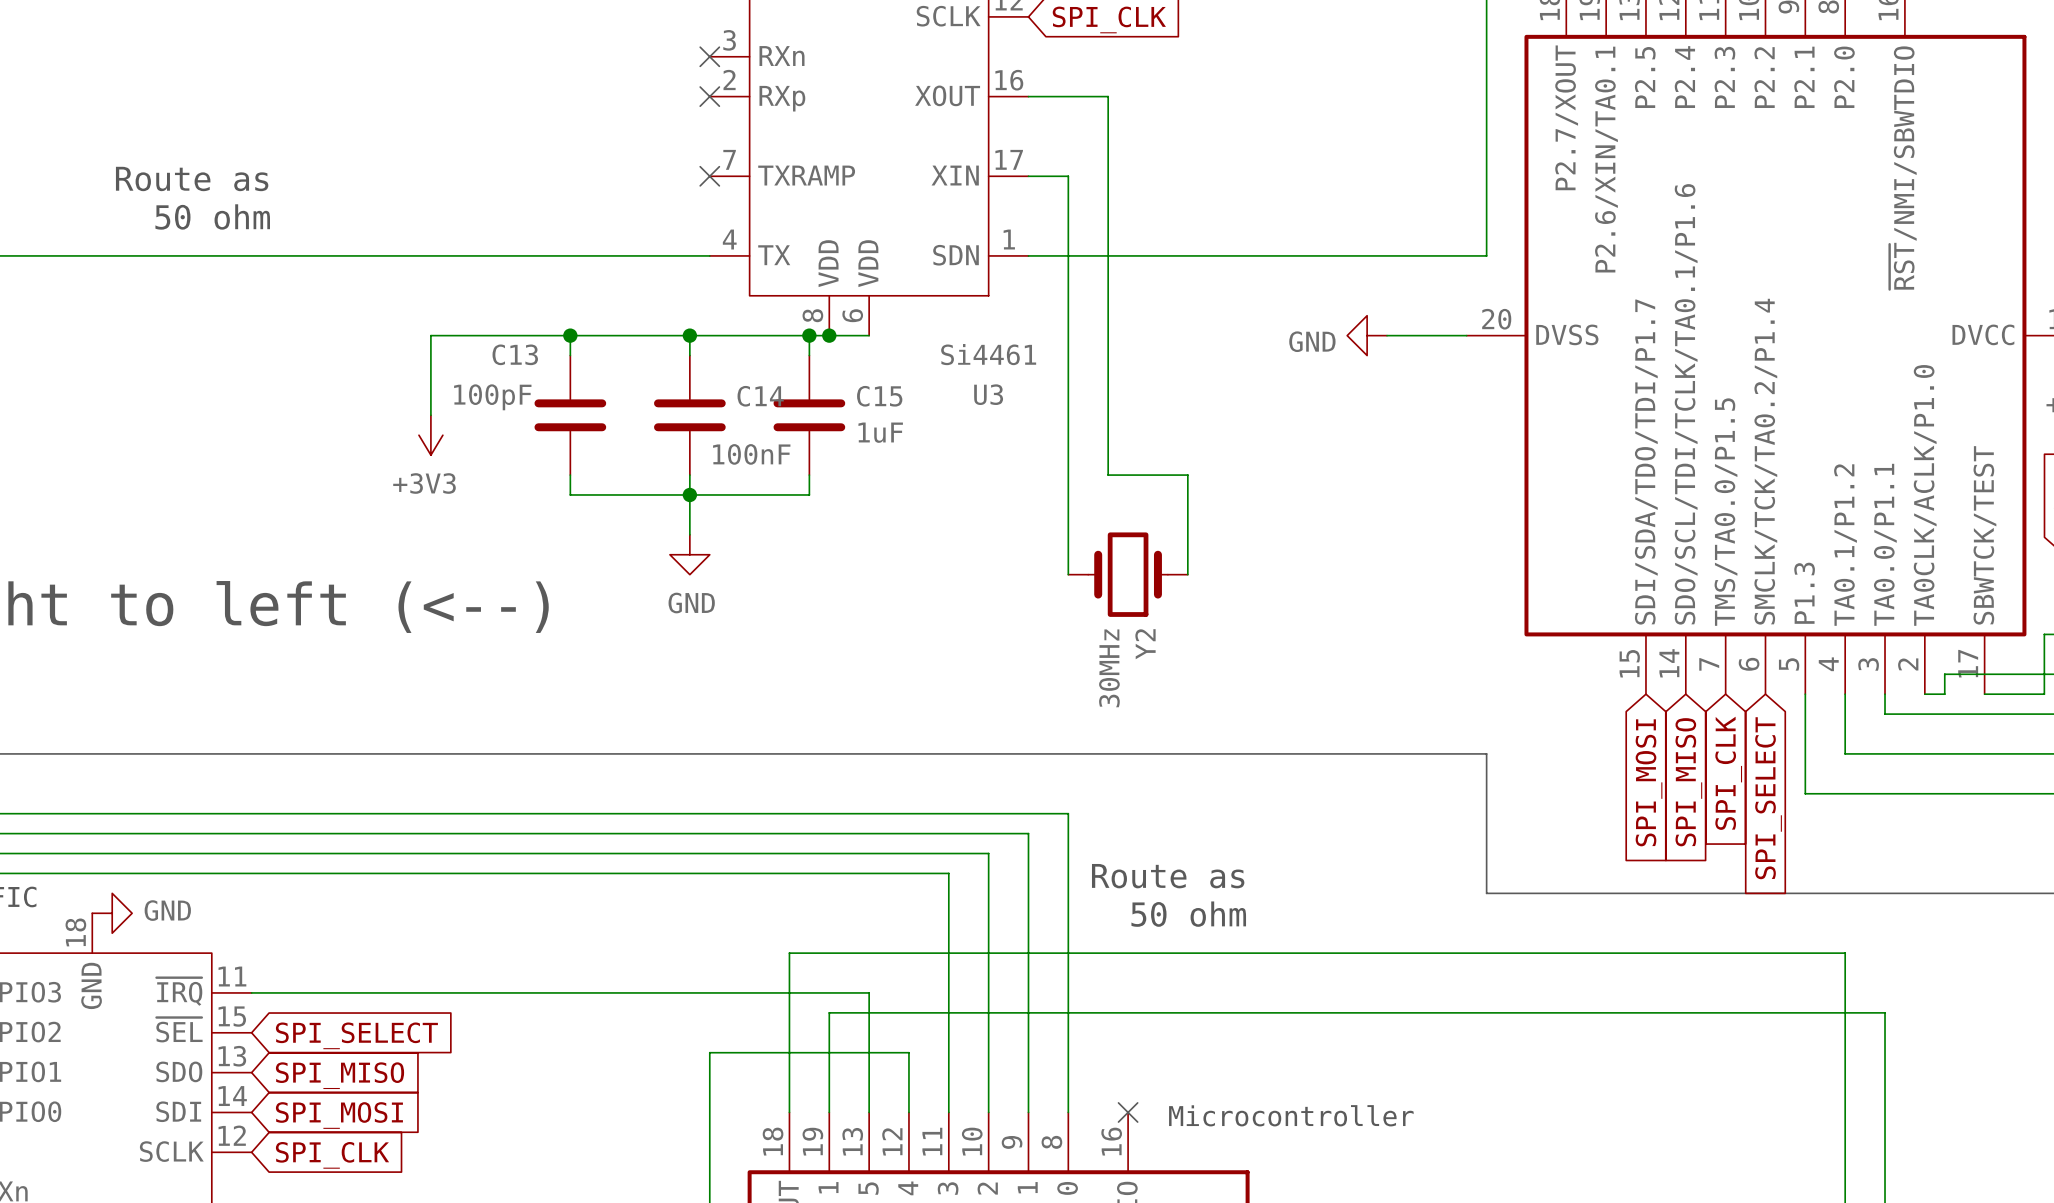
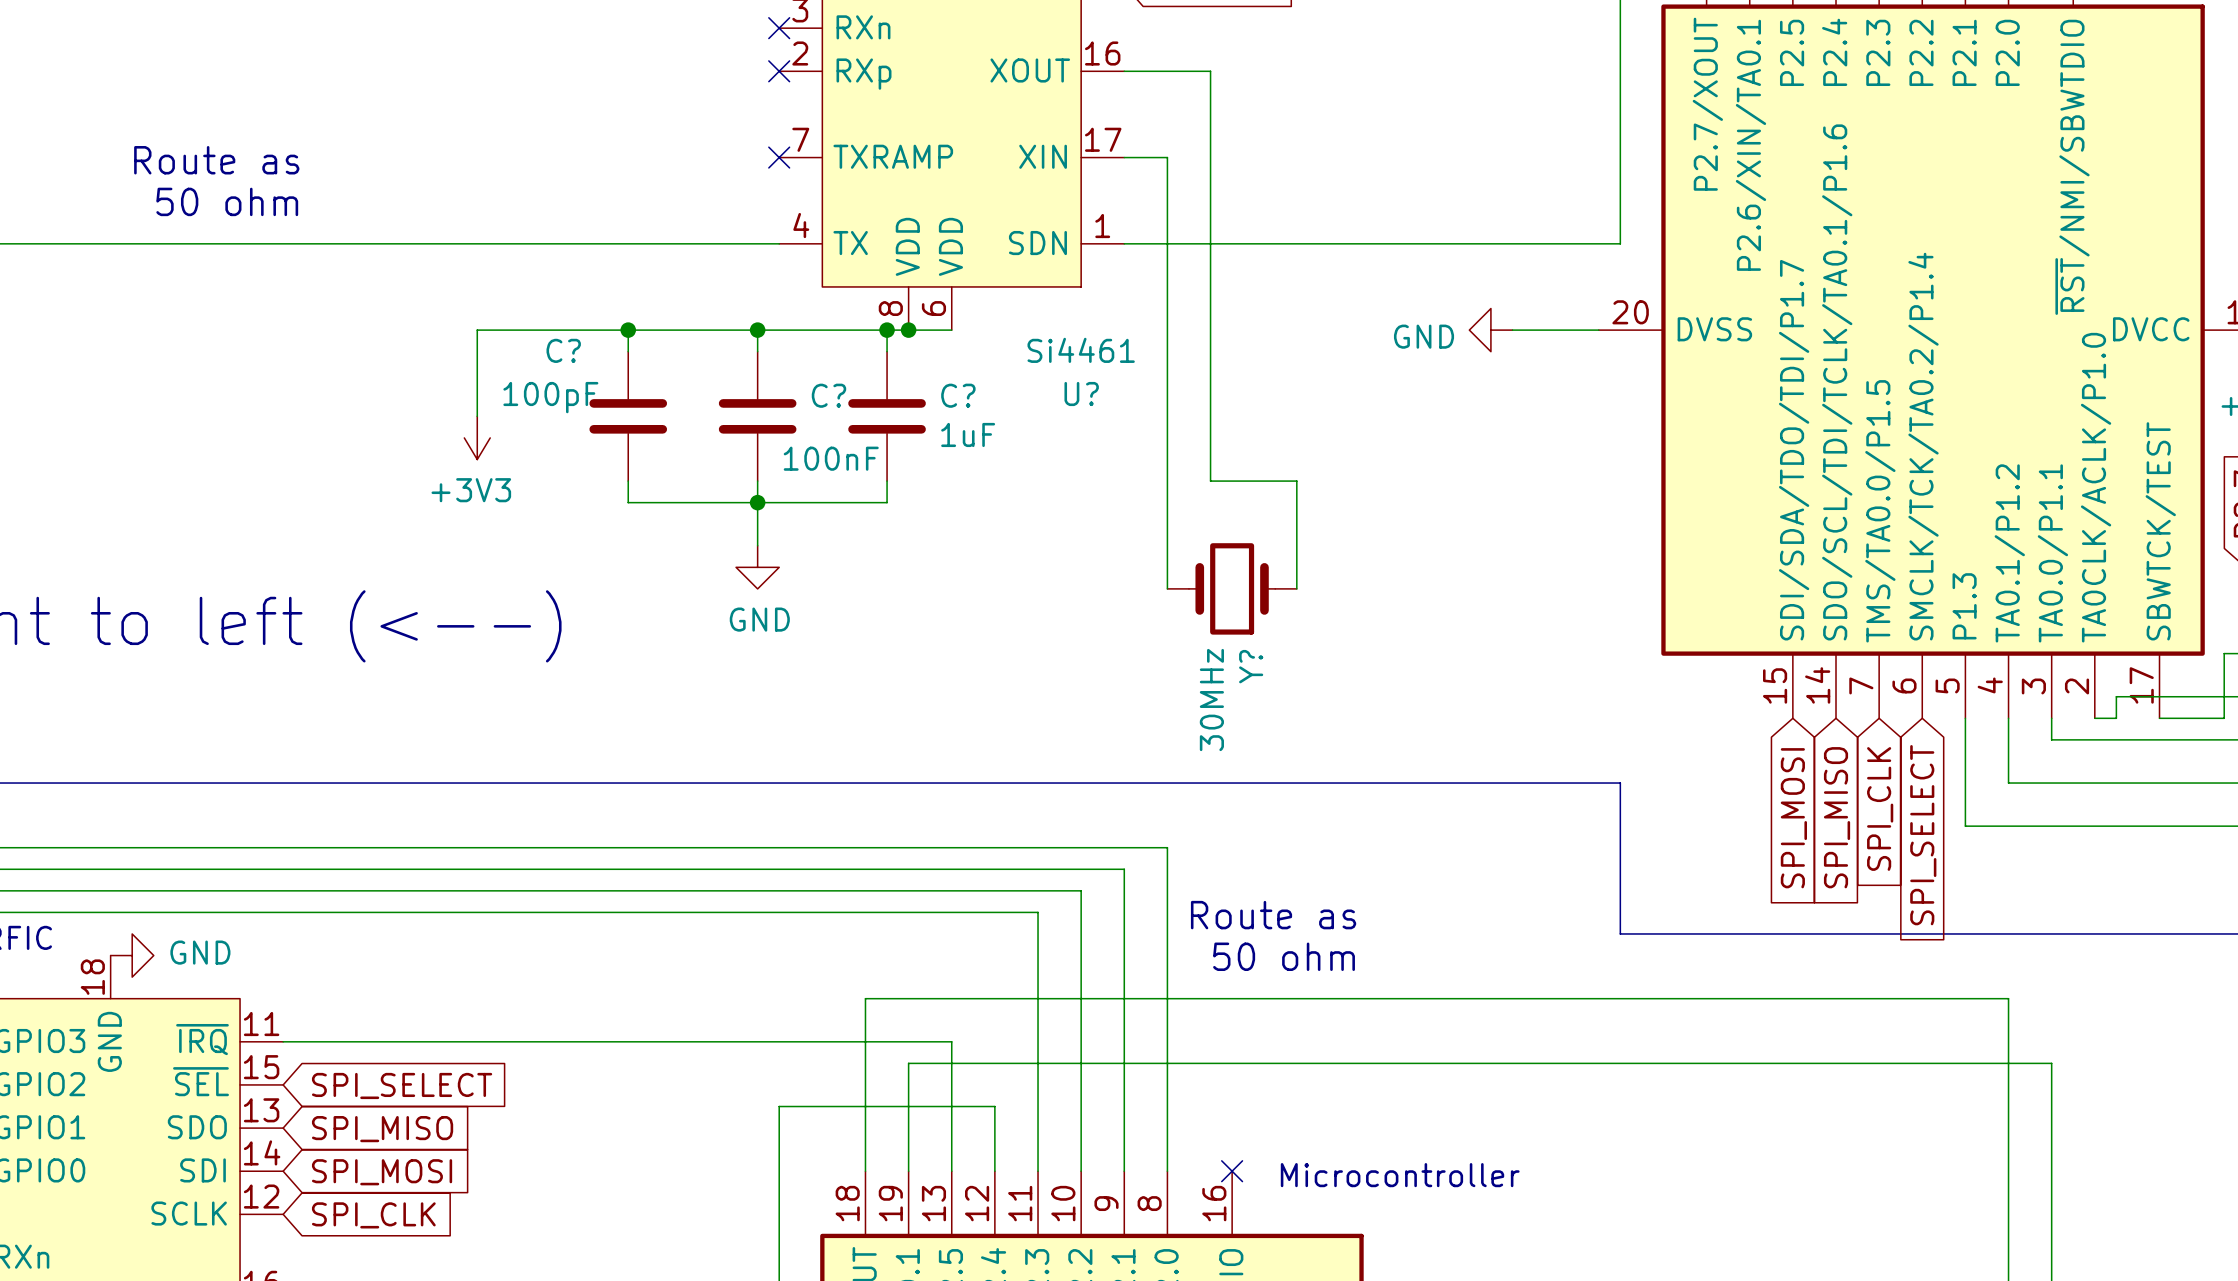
C13 name: C13 (515, 354) -> C? (563, 350)
U3 name: U3 (988, 394) -> U? (1081, 394)
C14 name: C14 (760, 396) -> C? (828, 395)
C15 name: C15 (879, 396) -> C? (958, 395)
Y2 name: Y2 (1145, 644) -> Y? (1251, 666)

